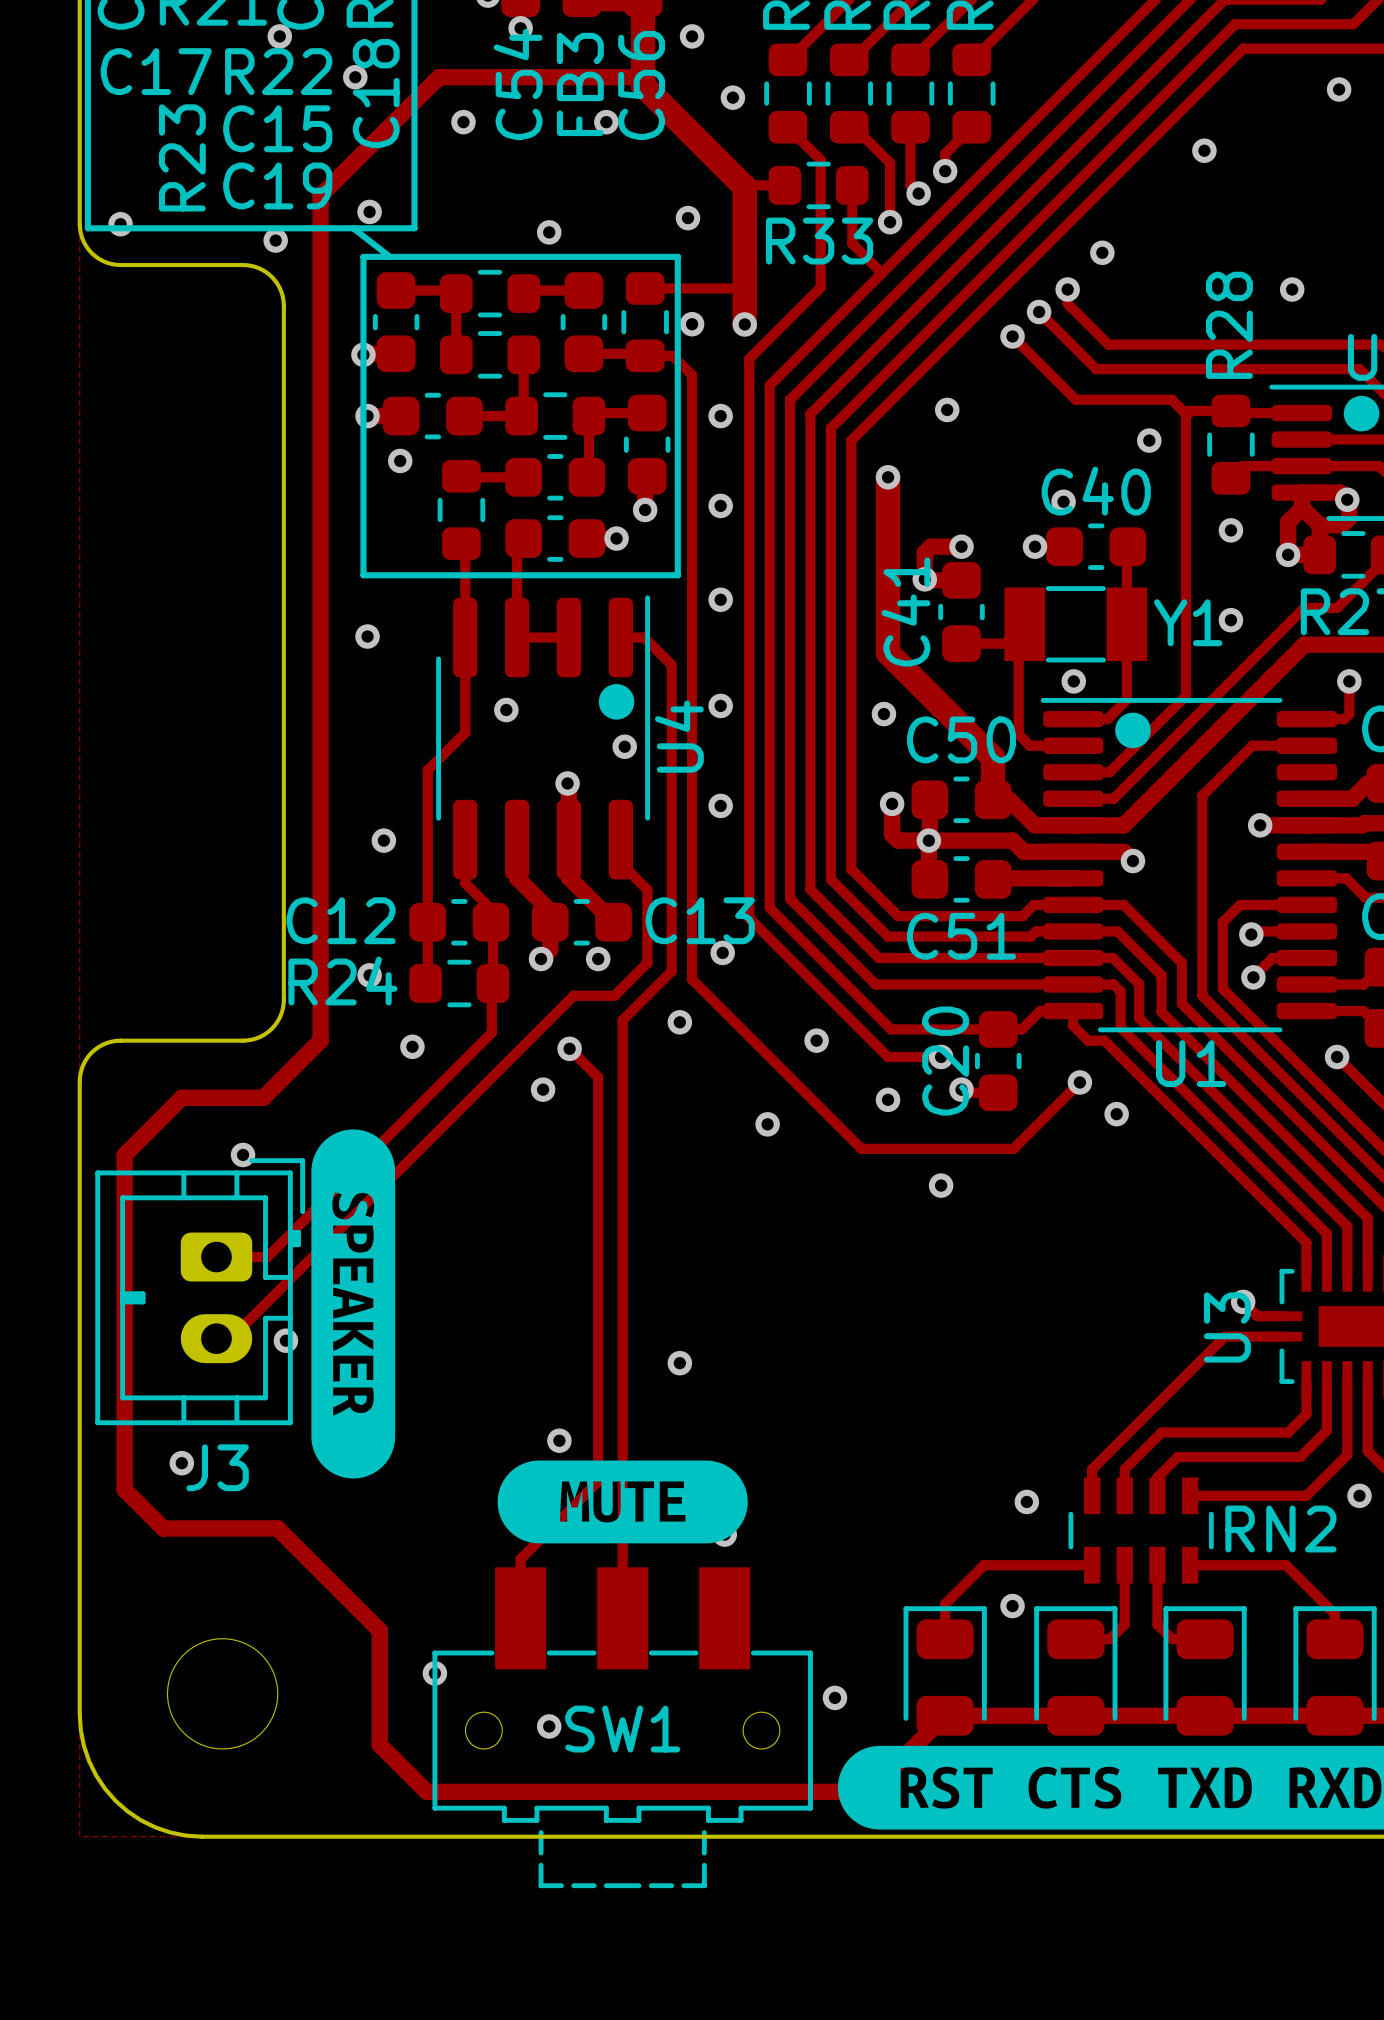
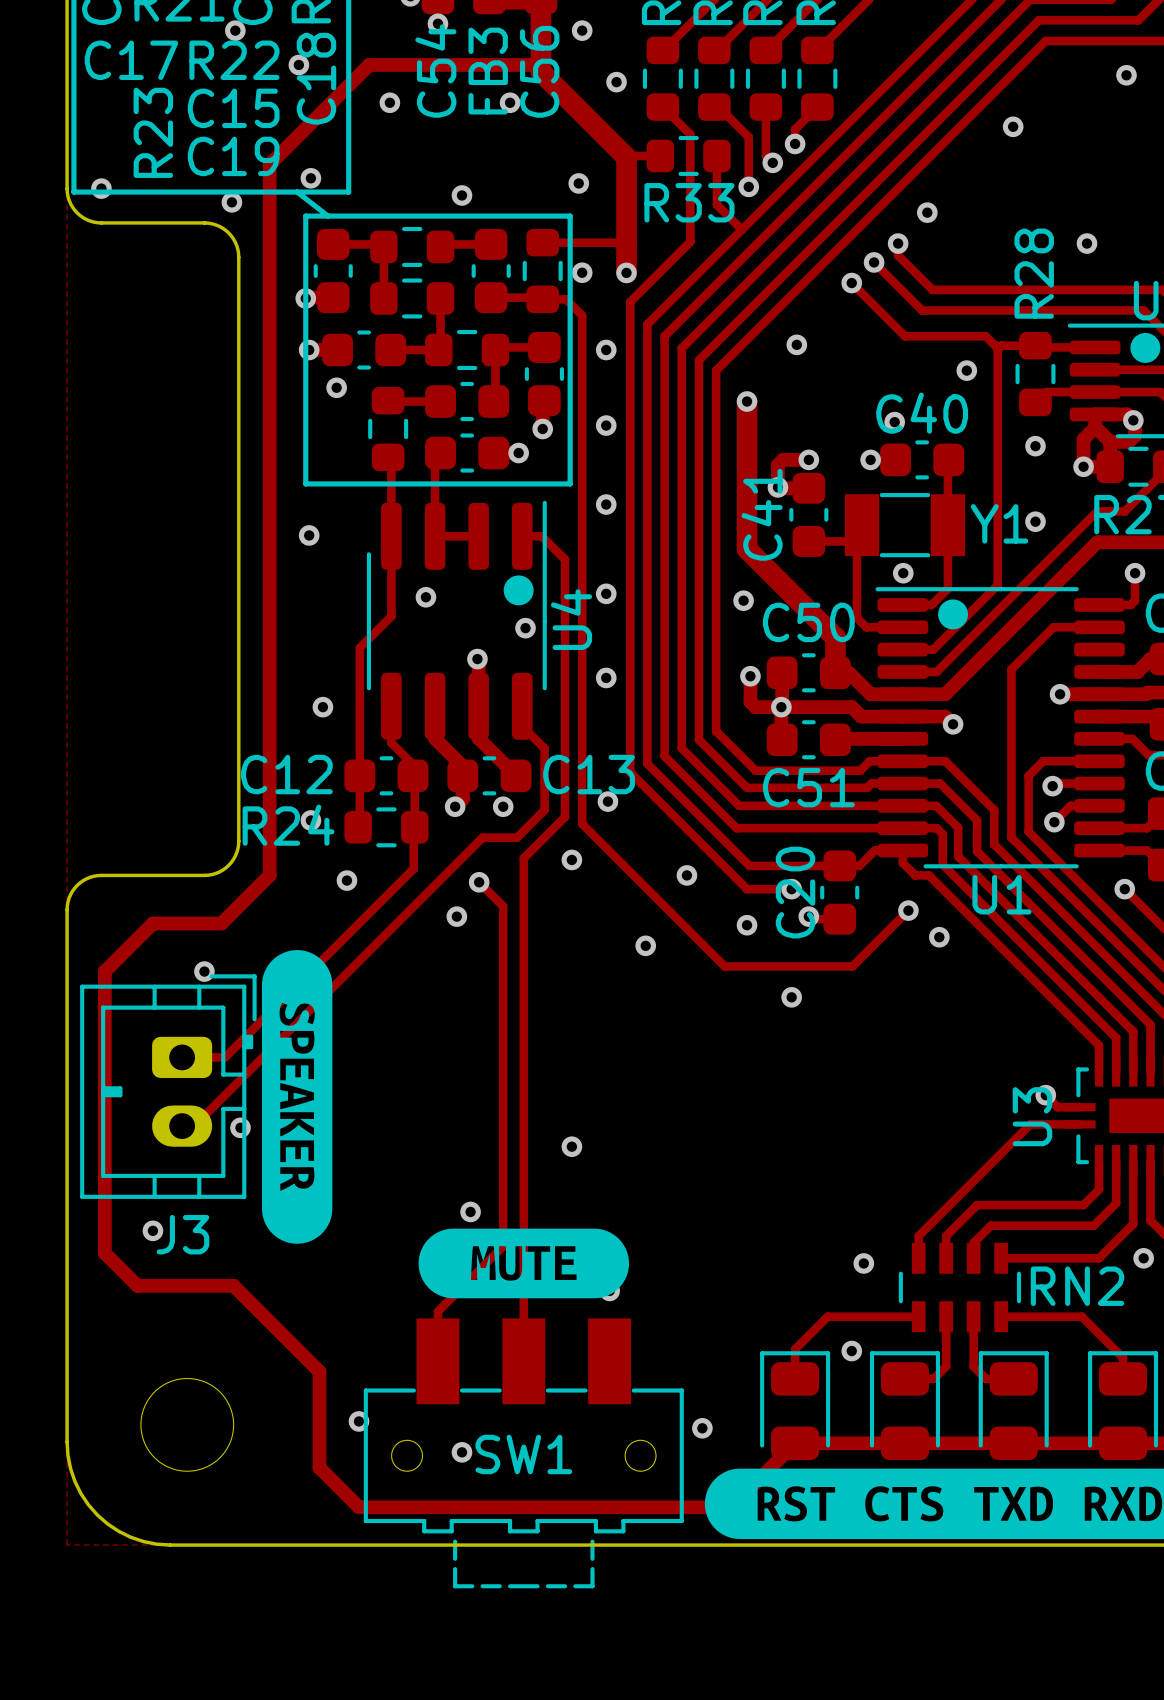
via position: (434, 1673) -> (358, 1421)

